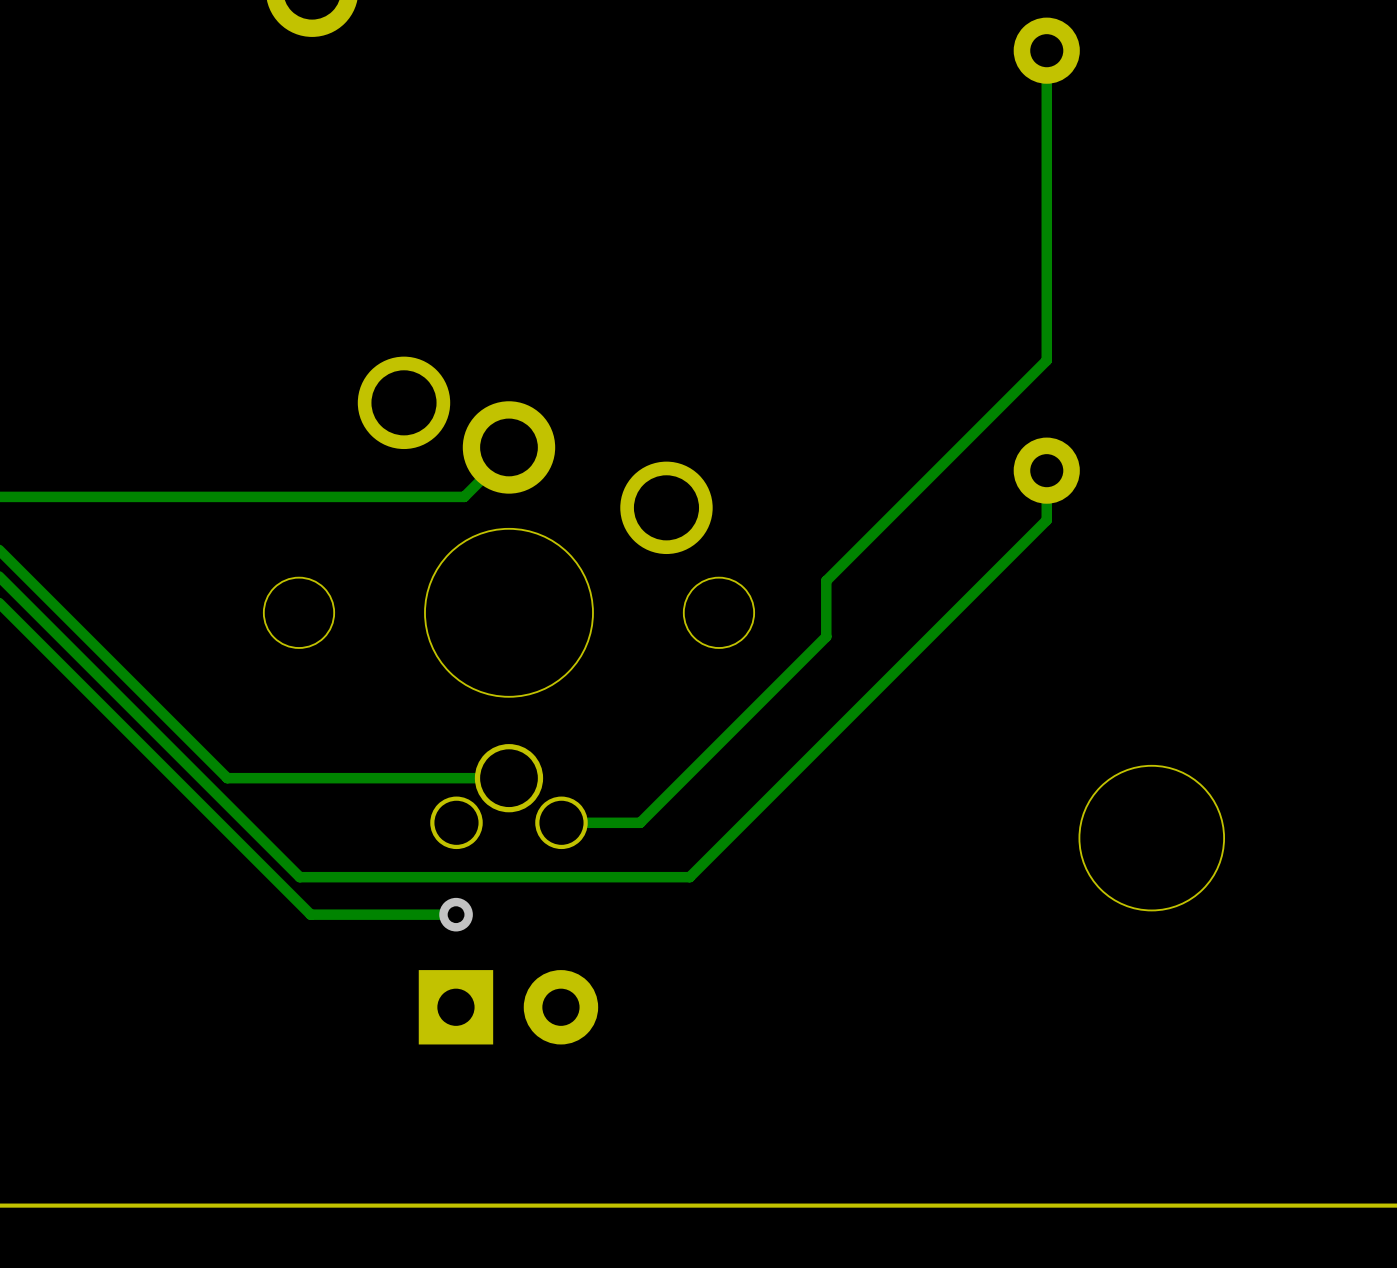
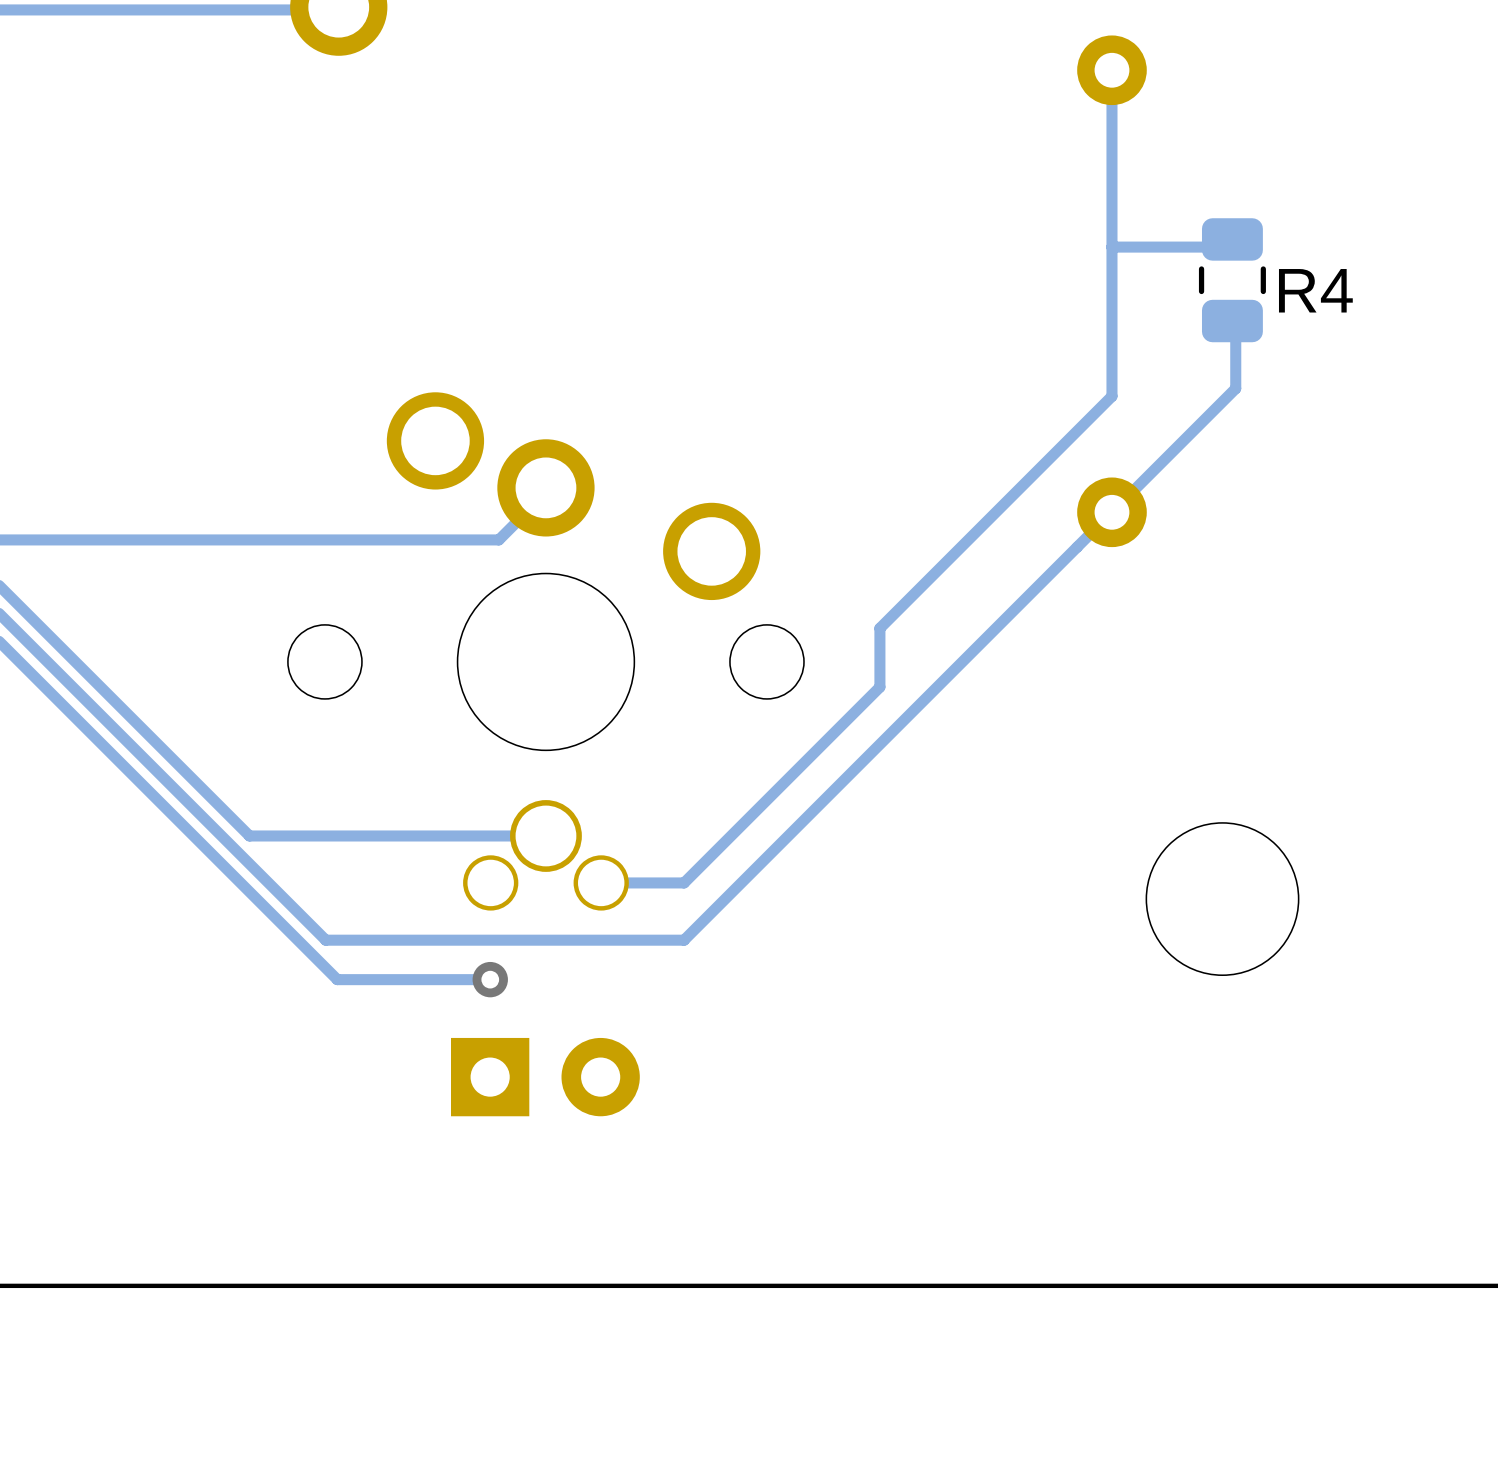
track: none -> (1232, 239) (1224, 247) (1111, 247)
R4: none -> (1232, 280)
track: (1046, 470) (1046, 520) (689, 877) (640, 877) -> (1232, 321) (1235, 324) (1235, 388) (684, 940)

